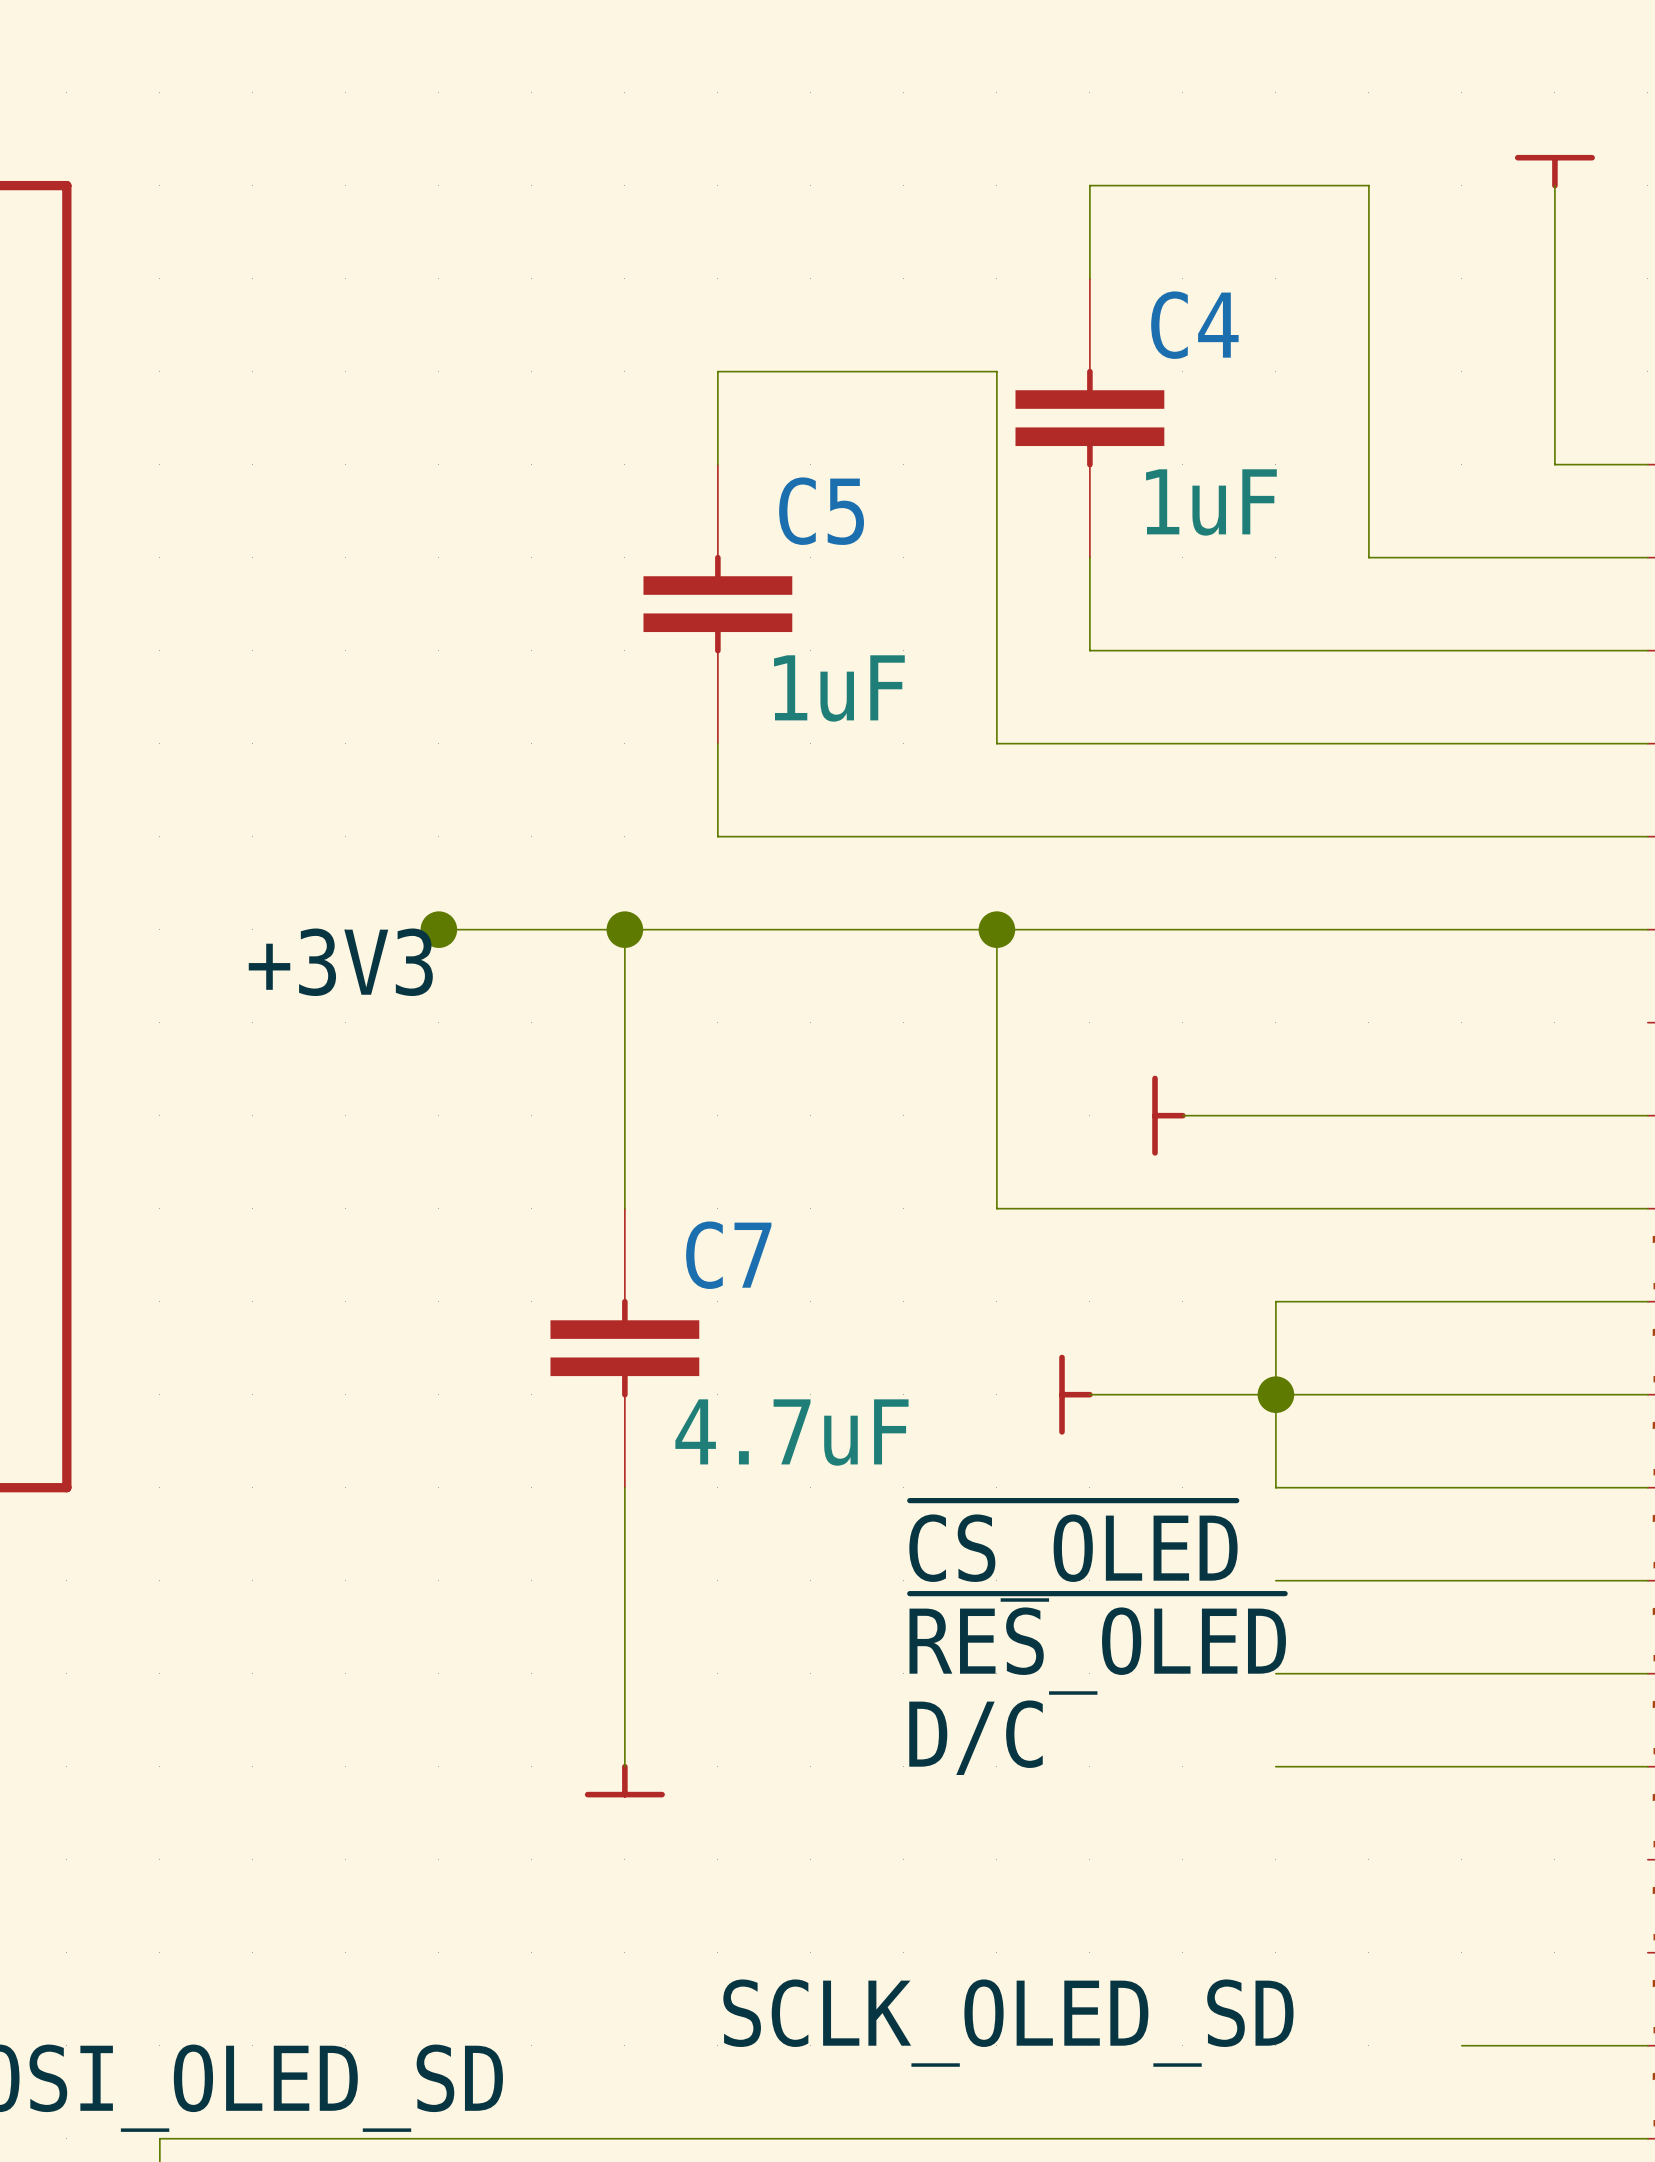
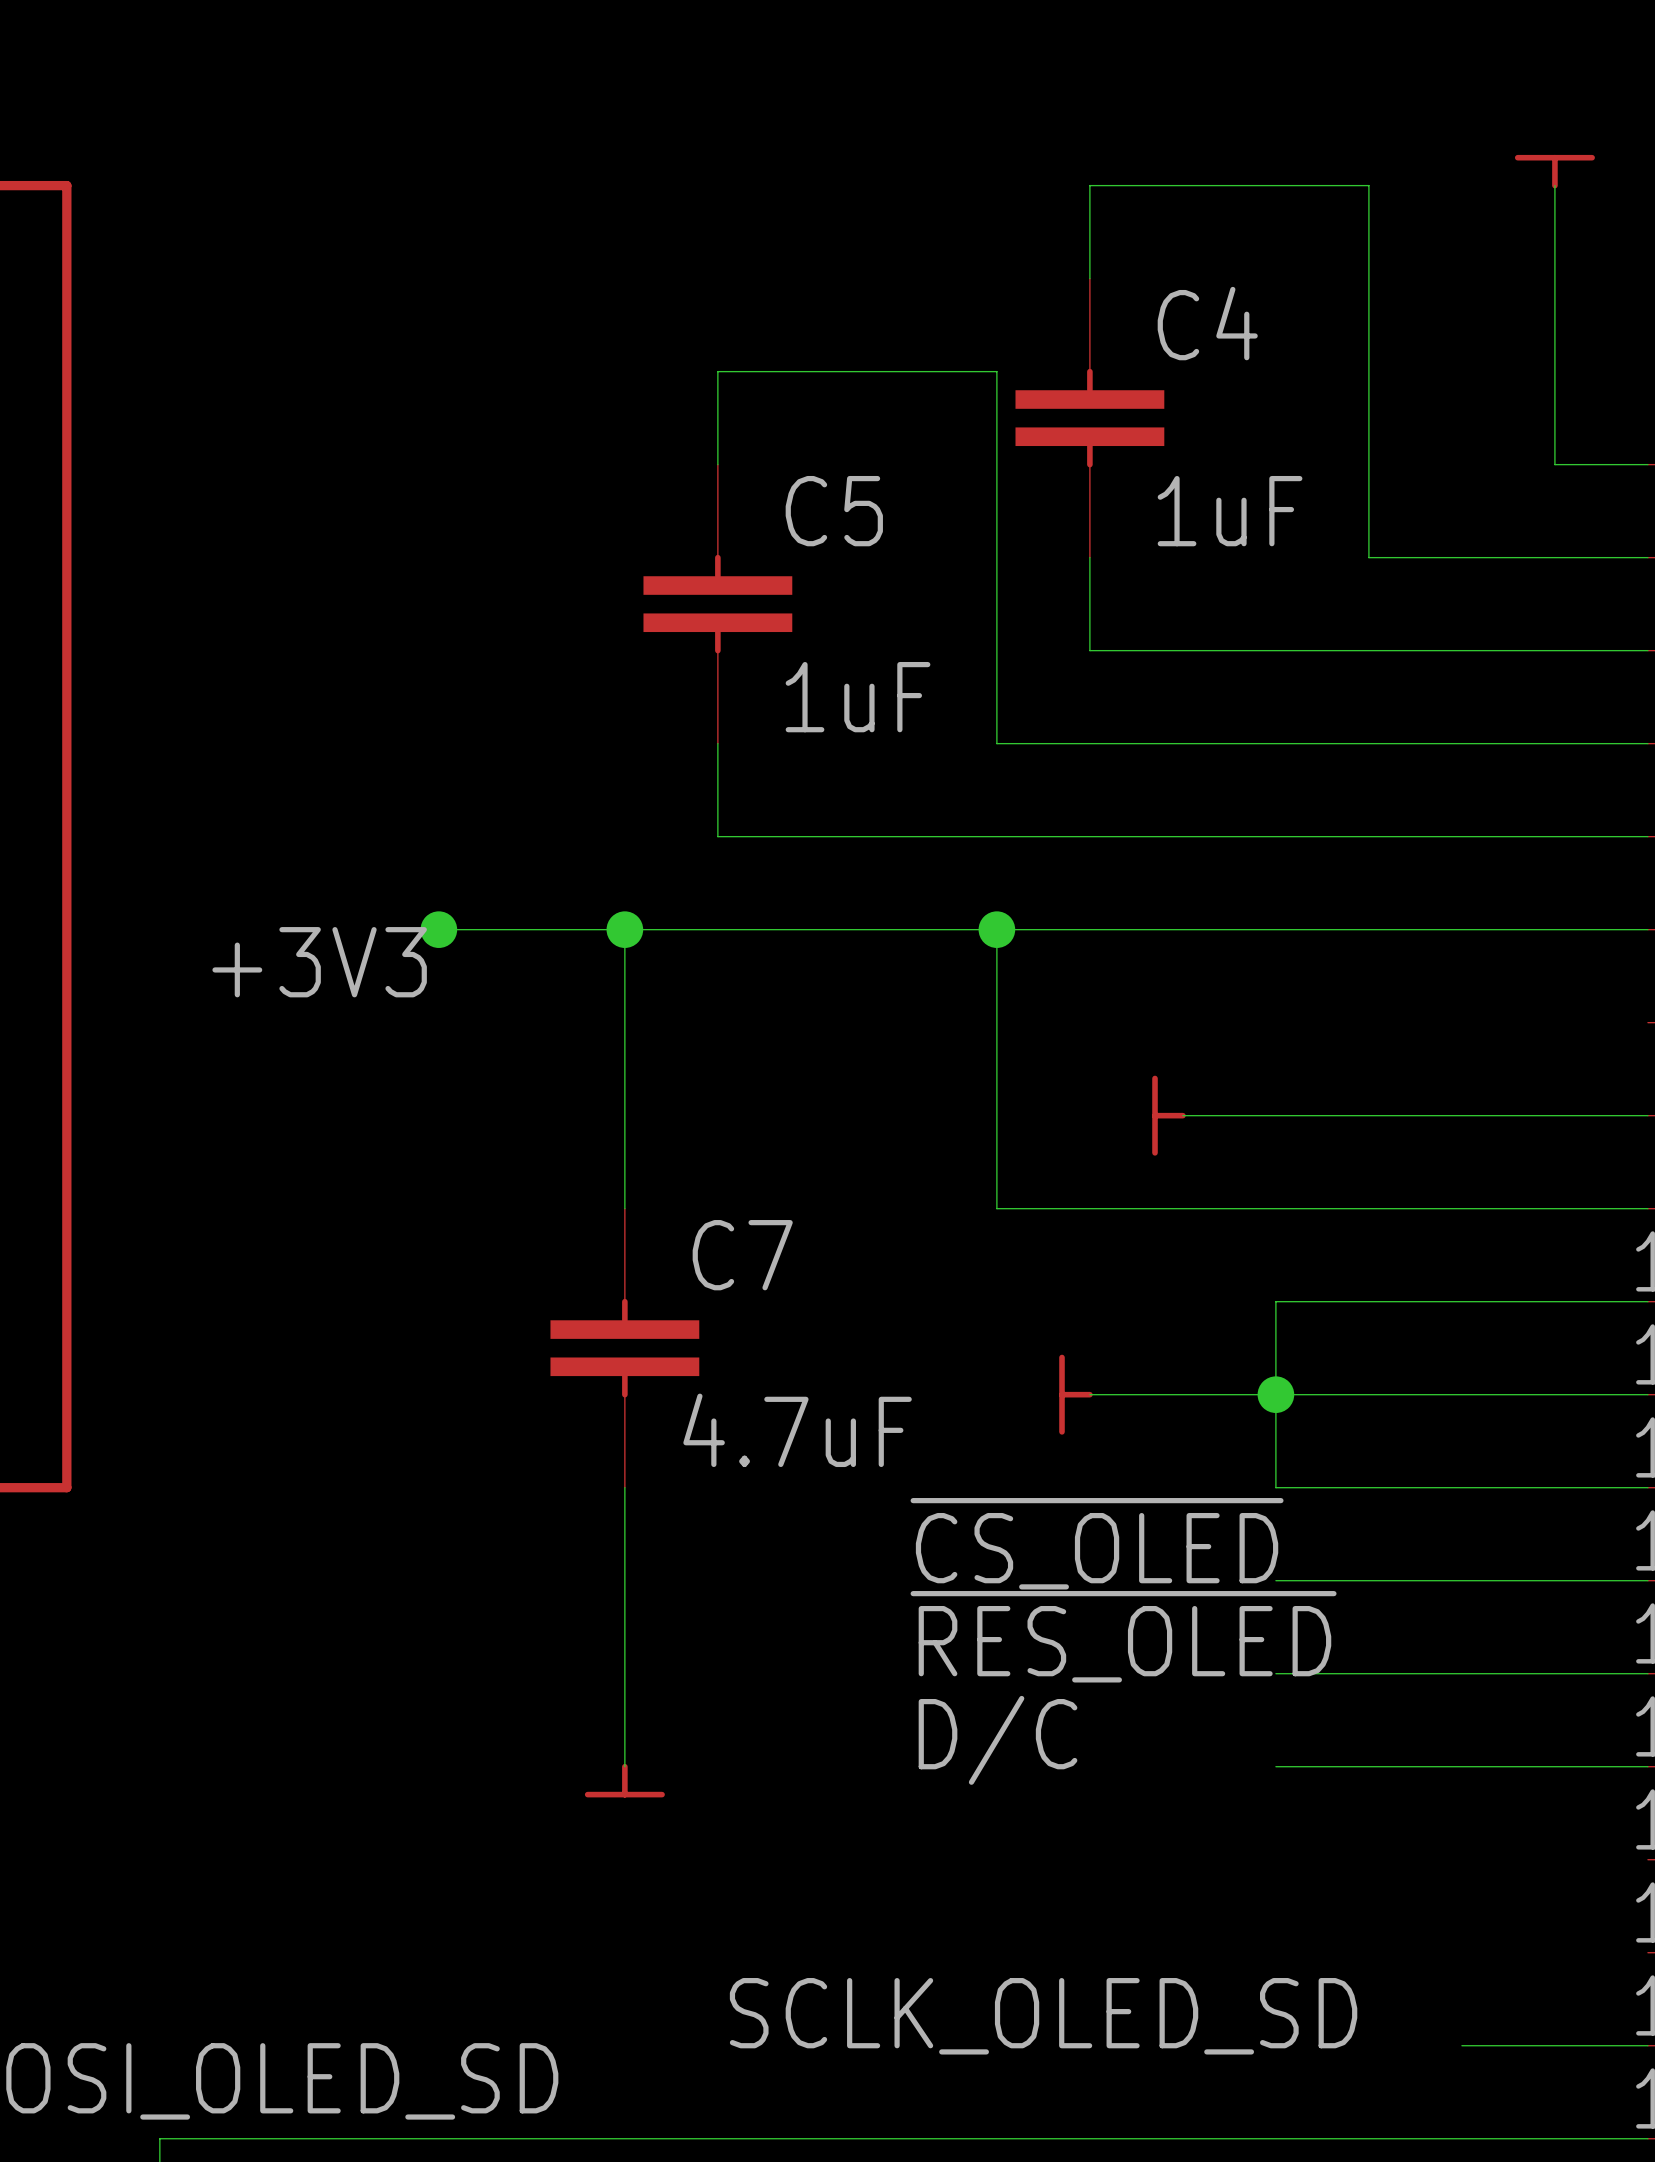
C4 value position: 1uF (1211, 502) -> 1uF (1230, 511)
C5 value position: 1uF (839, 688) -> 1uF (858, 697)

